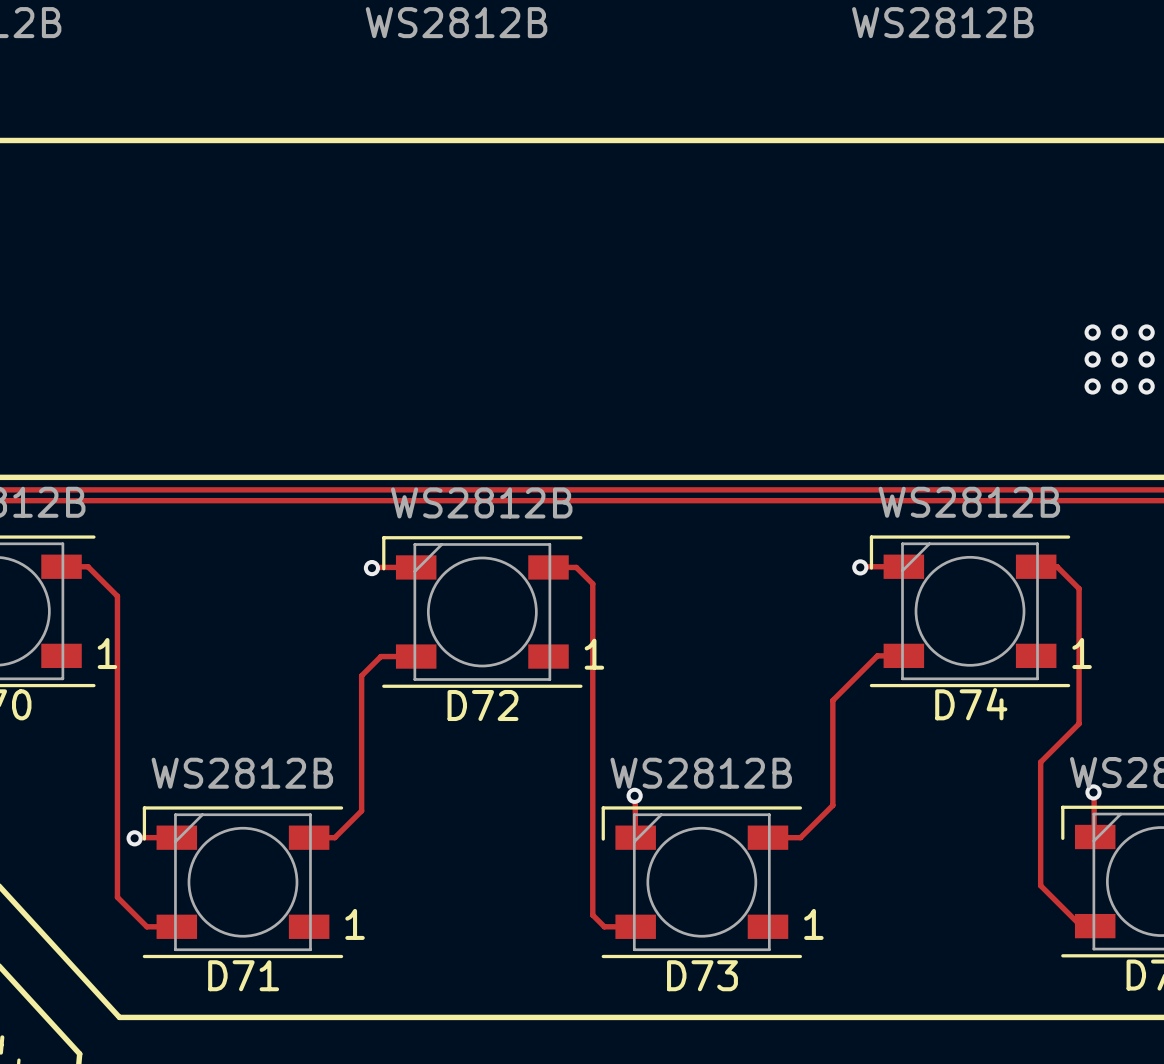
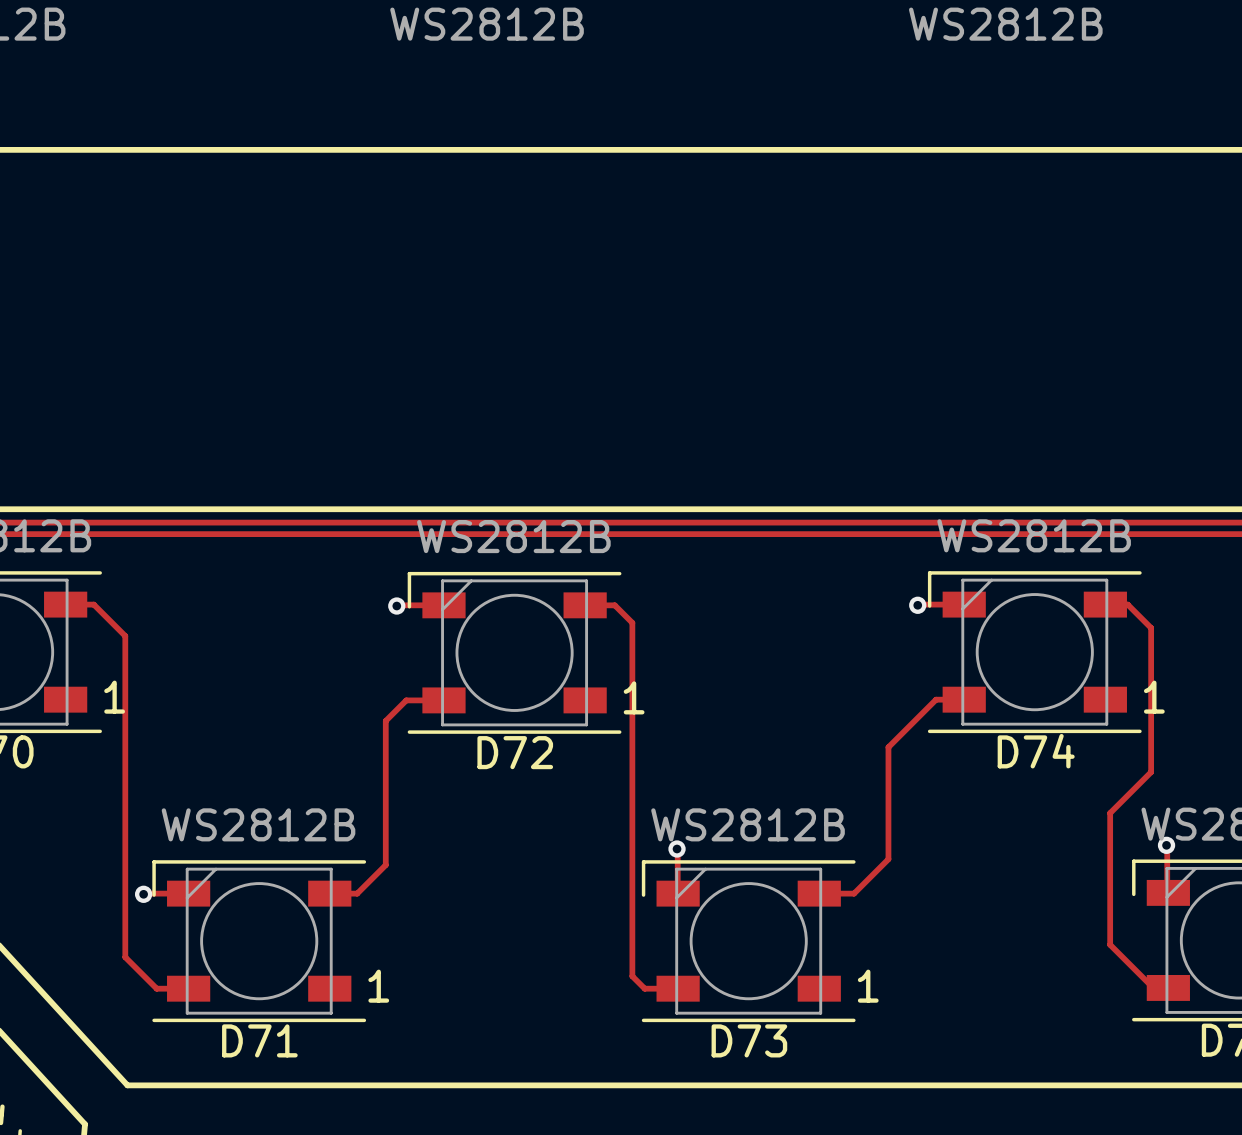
via: (1092, 332) -> none
via: (1119, 332) -> none
via: (1146, 332) -> none
via: (1092, 359) -> none
via: (1119, 359) -> none
via: (1146, 359) -> none
via: (1092, 386) -> none
via: (1119, 386) -> none
via: (1146, 386) -> none

